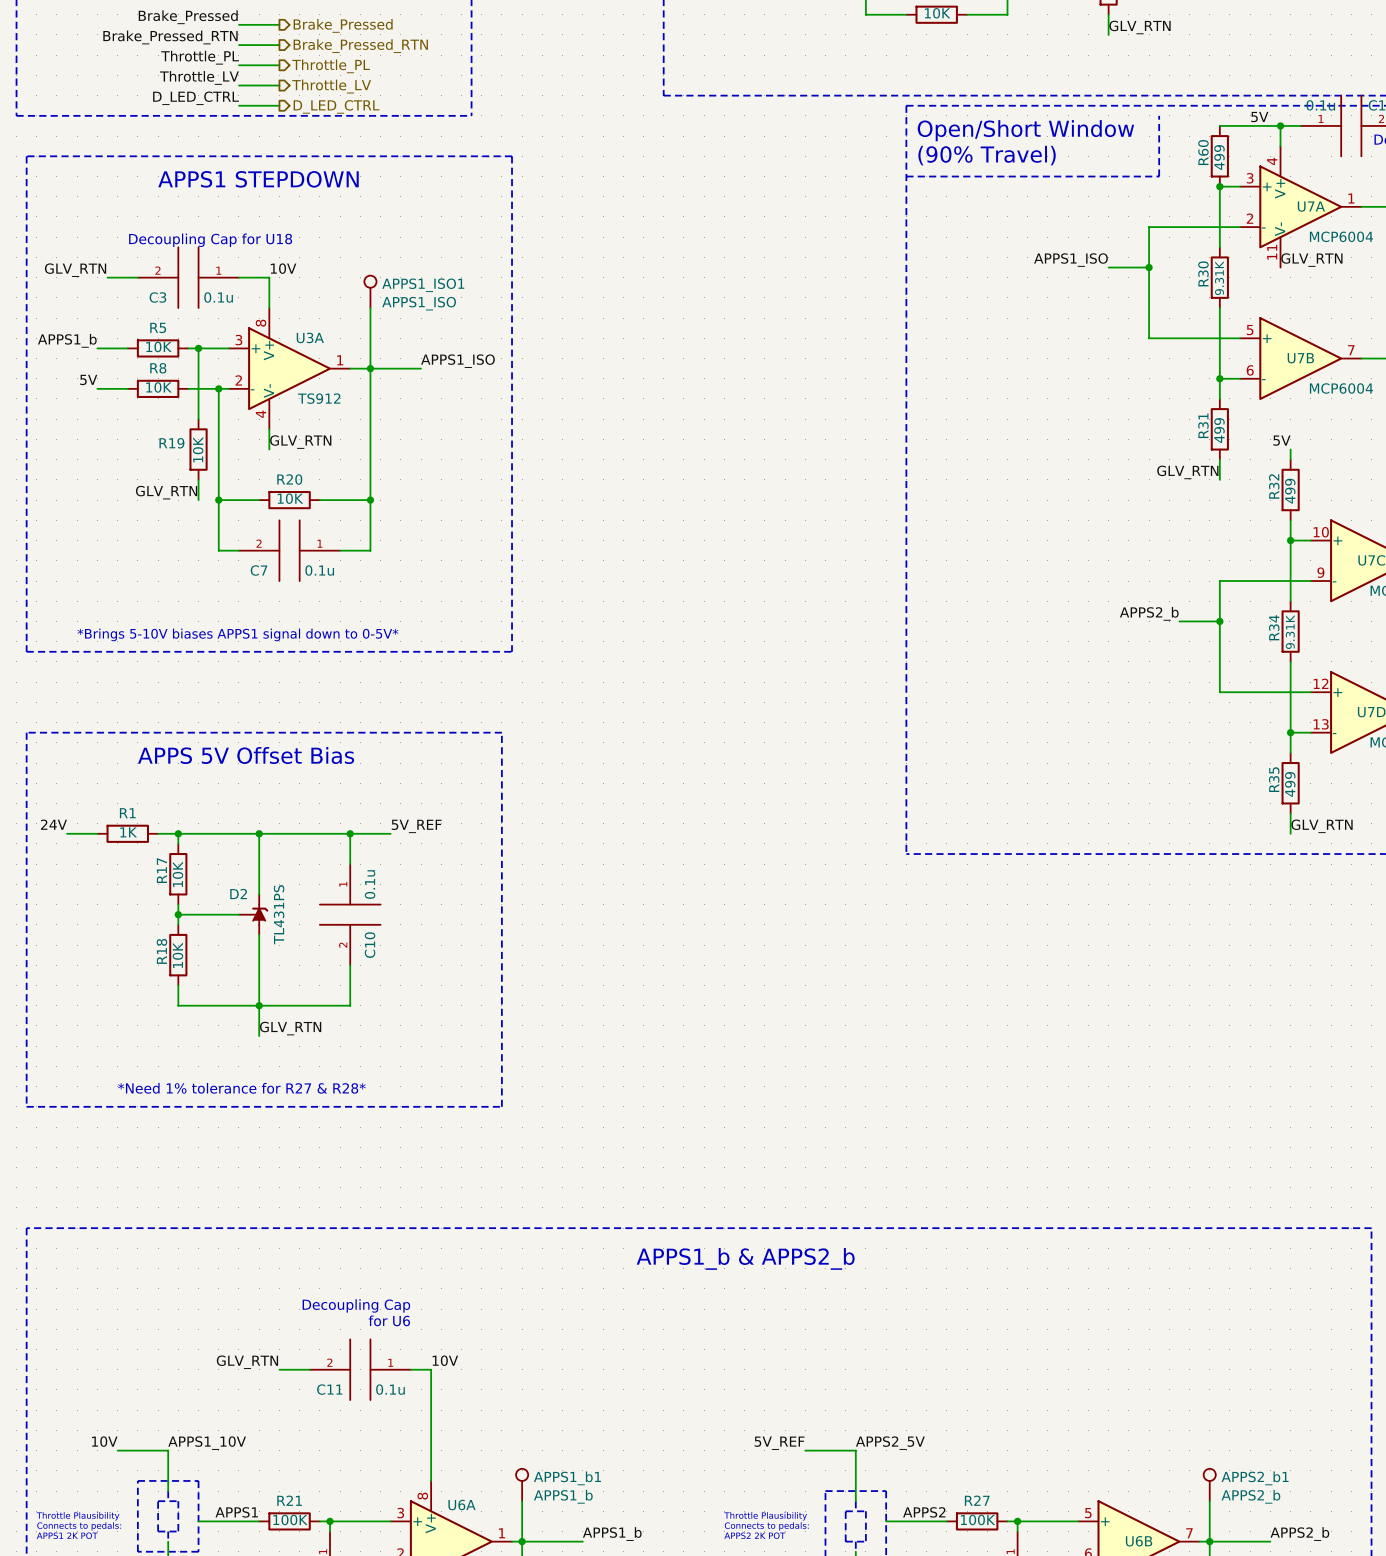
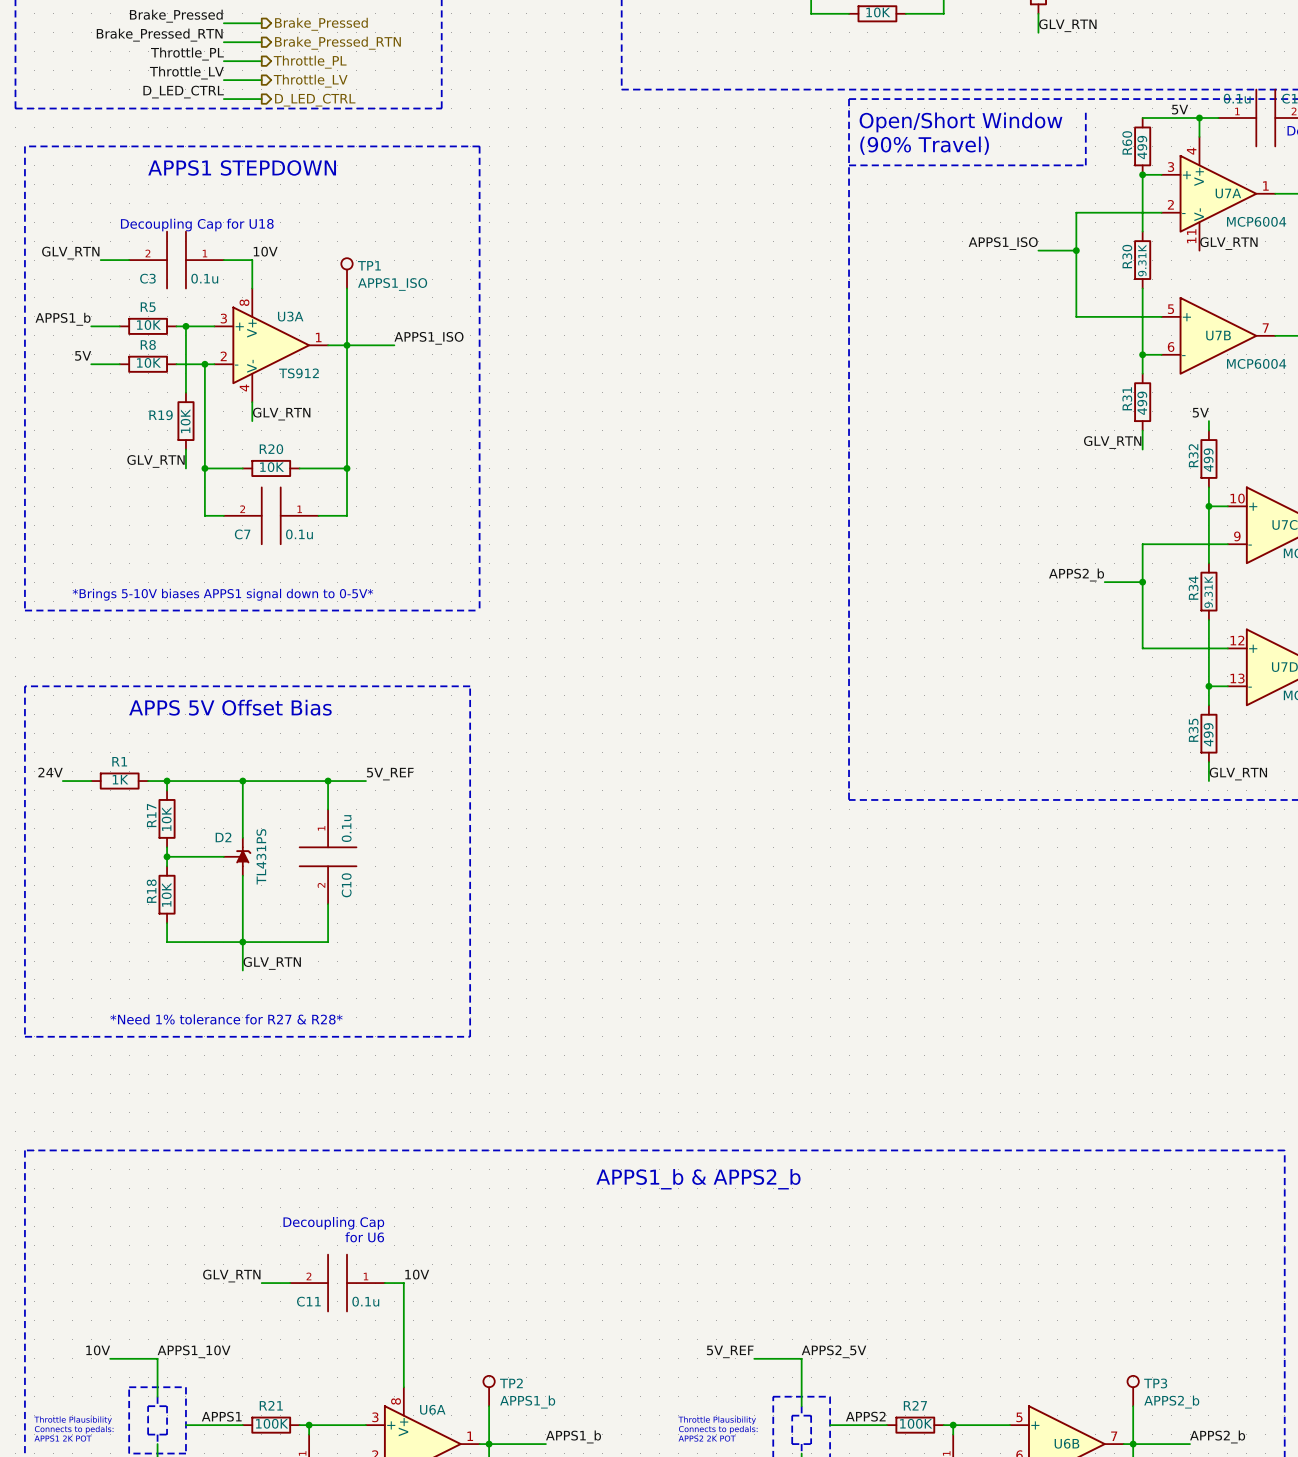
APPS1_ISO1 name: APPS1_ISO1 (423, 285) -> TP1 (369, 265)
APPS1_b1 name: APPS1_b1 (567, 1478) -> TP2 (511, 1383)
APPS2_b1 name: APPS2_b1 (1255, 1478) -> TP3 (1155, 1383)

